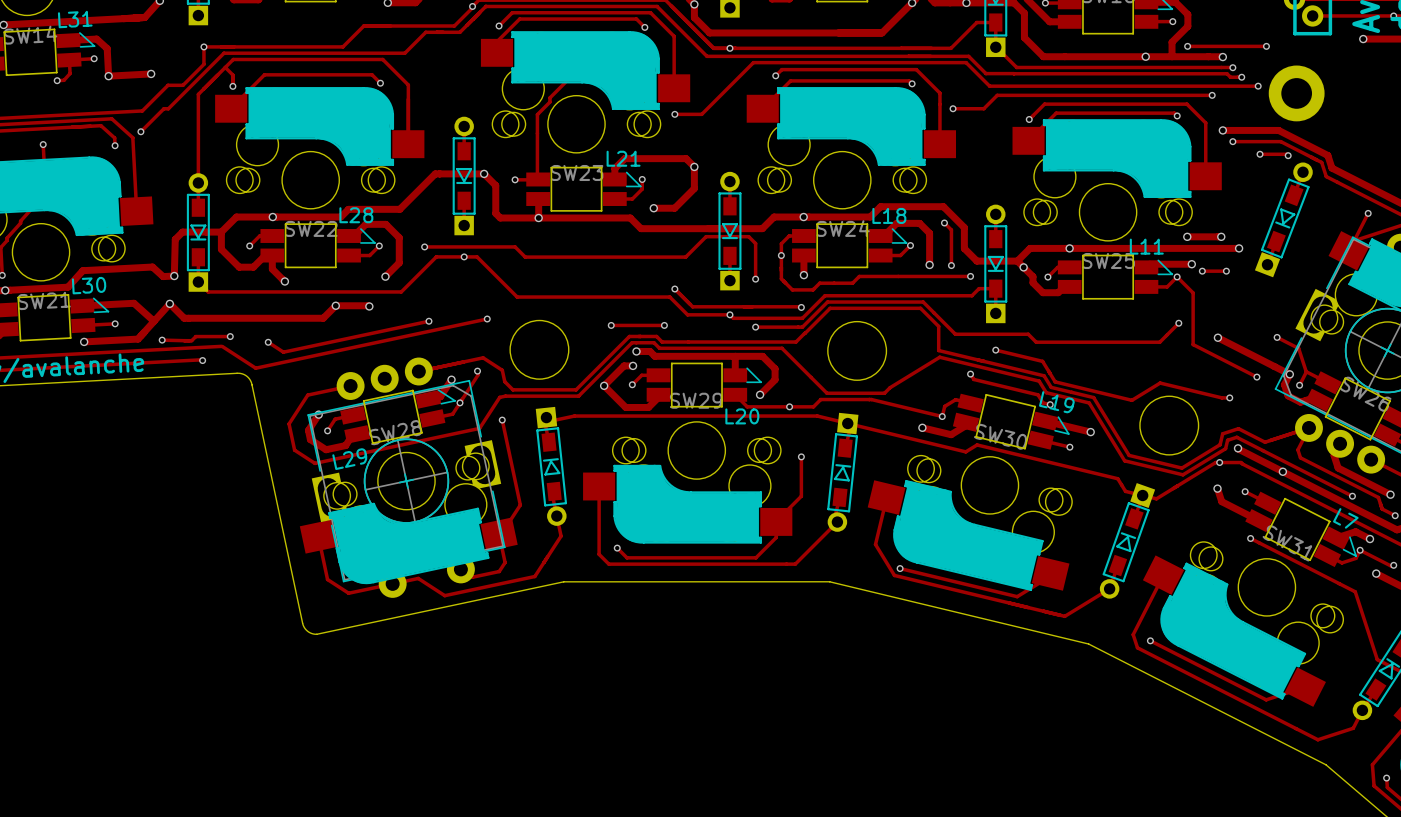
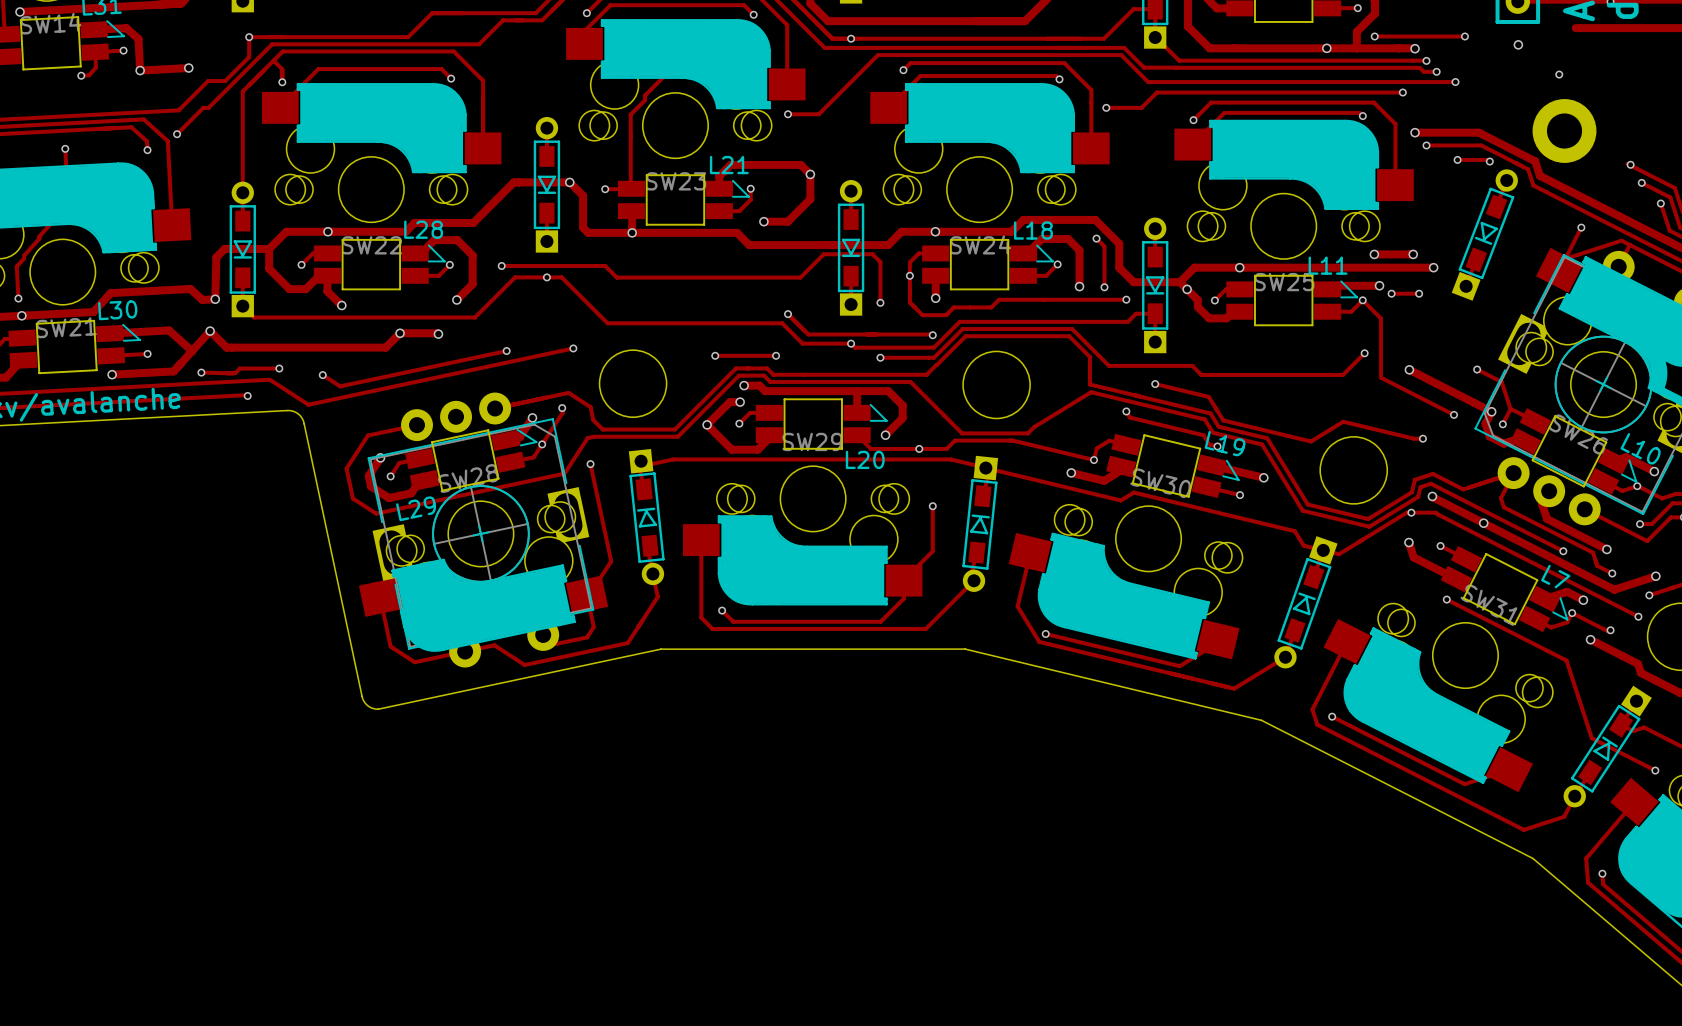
via position: (1363, 39) -> (1518, 44)
via: none -> (1559, 74)
part position: (1296, 93) -> (1564, 131)

